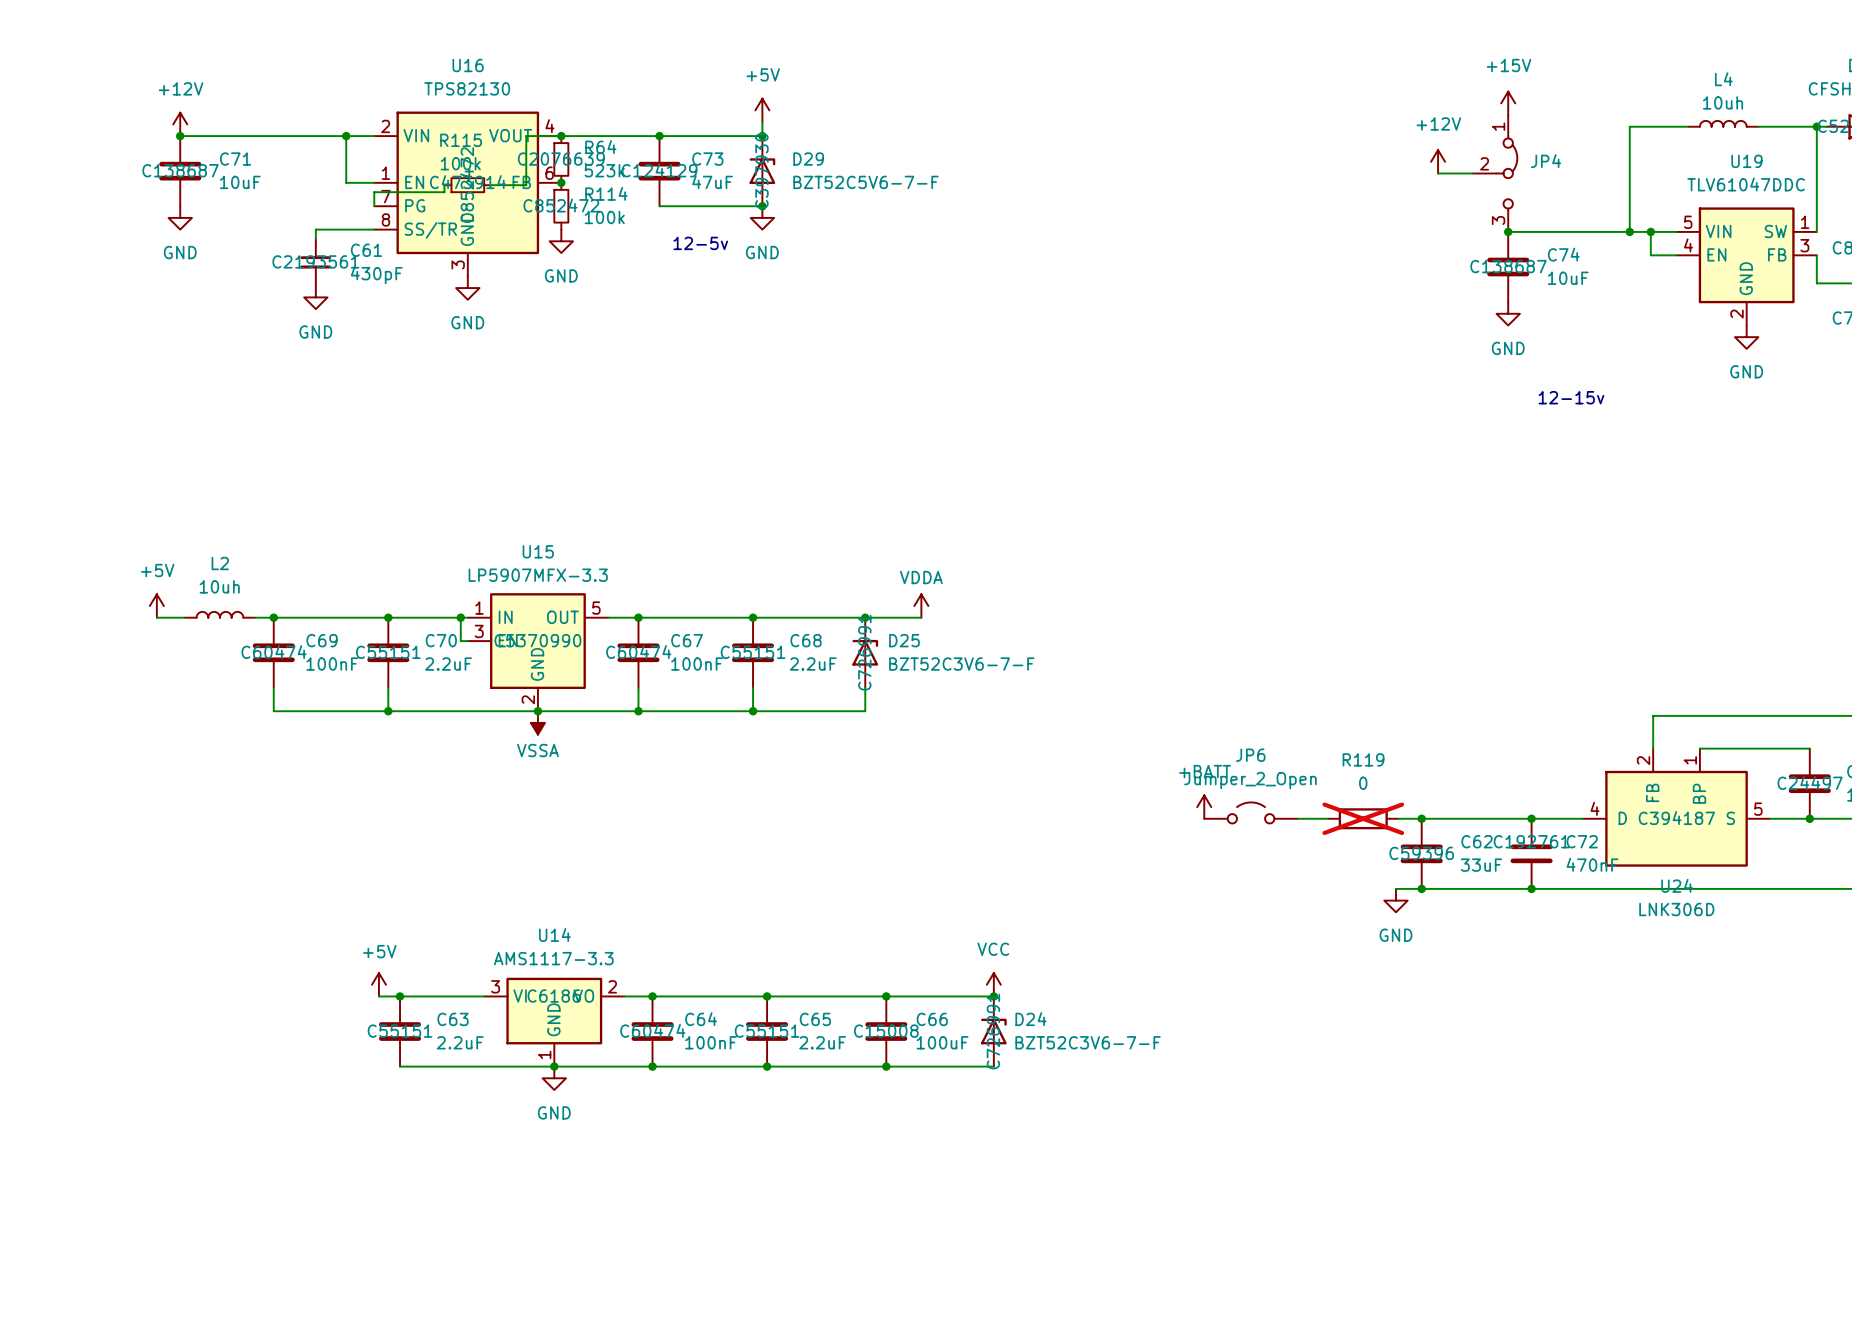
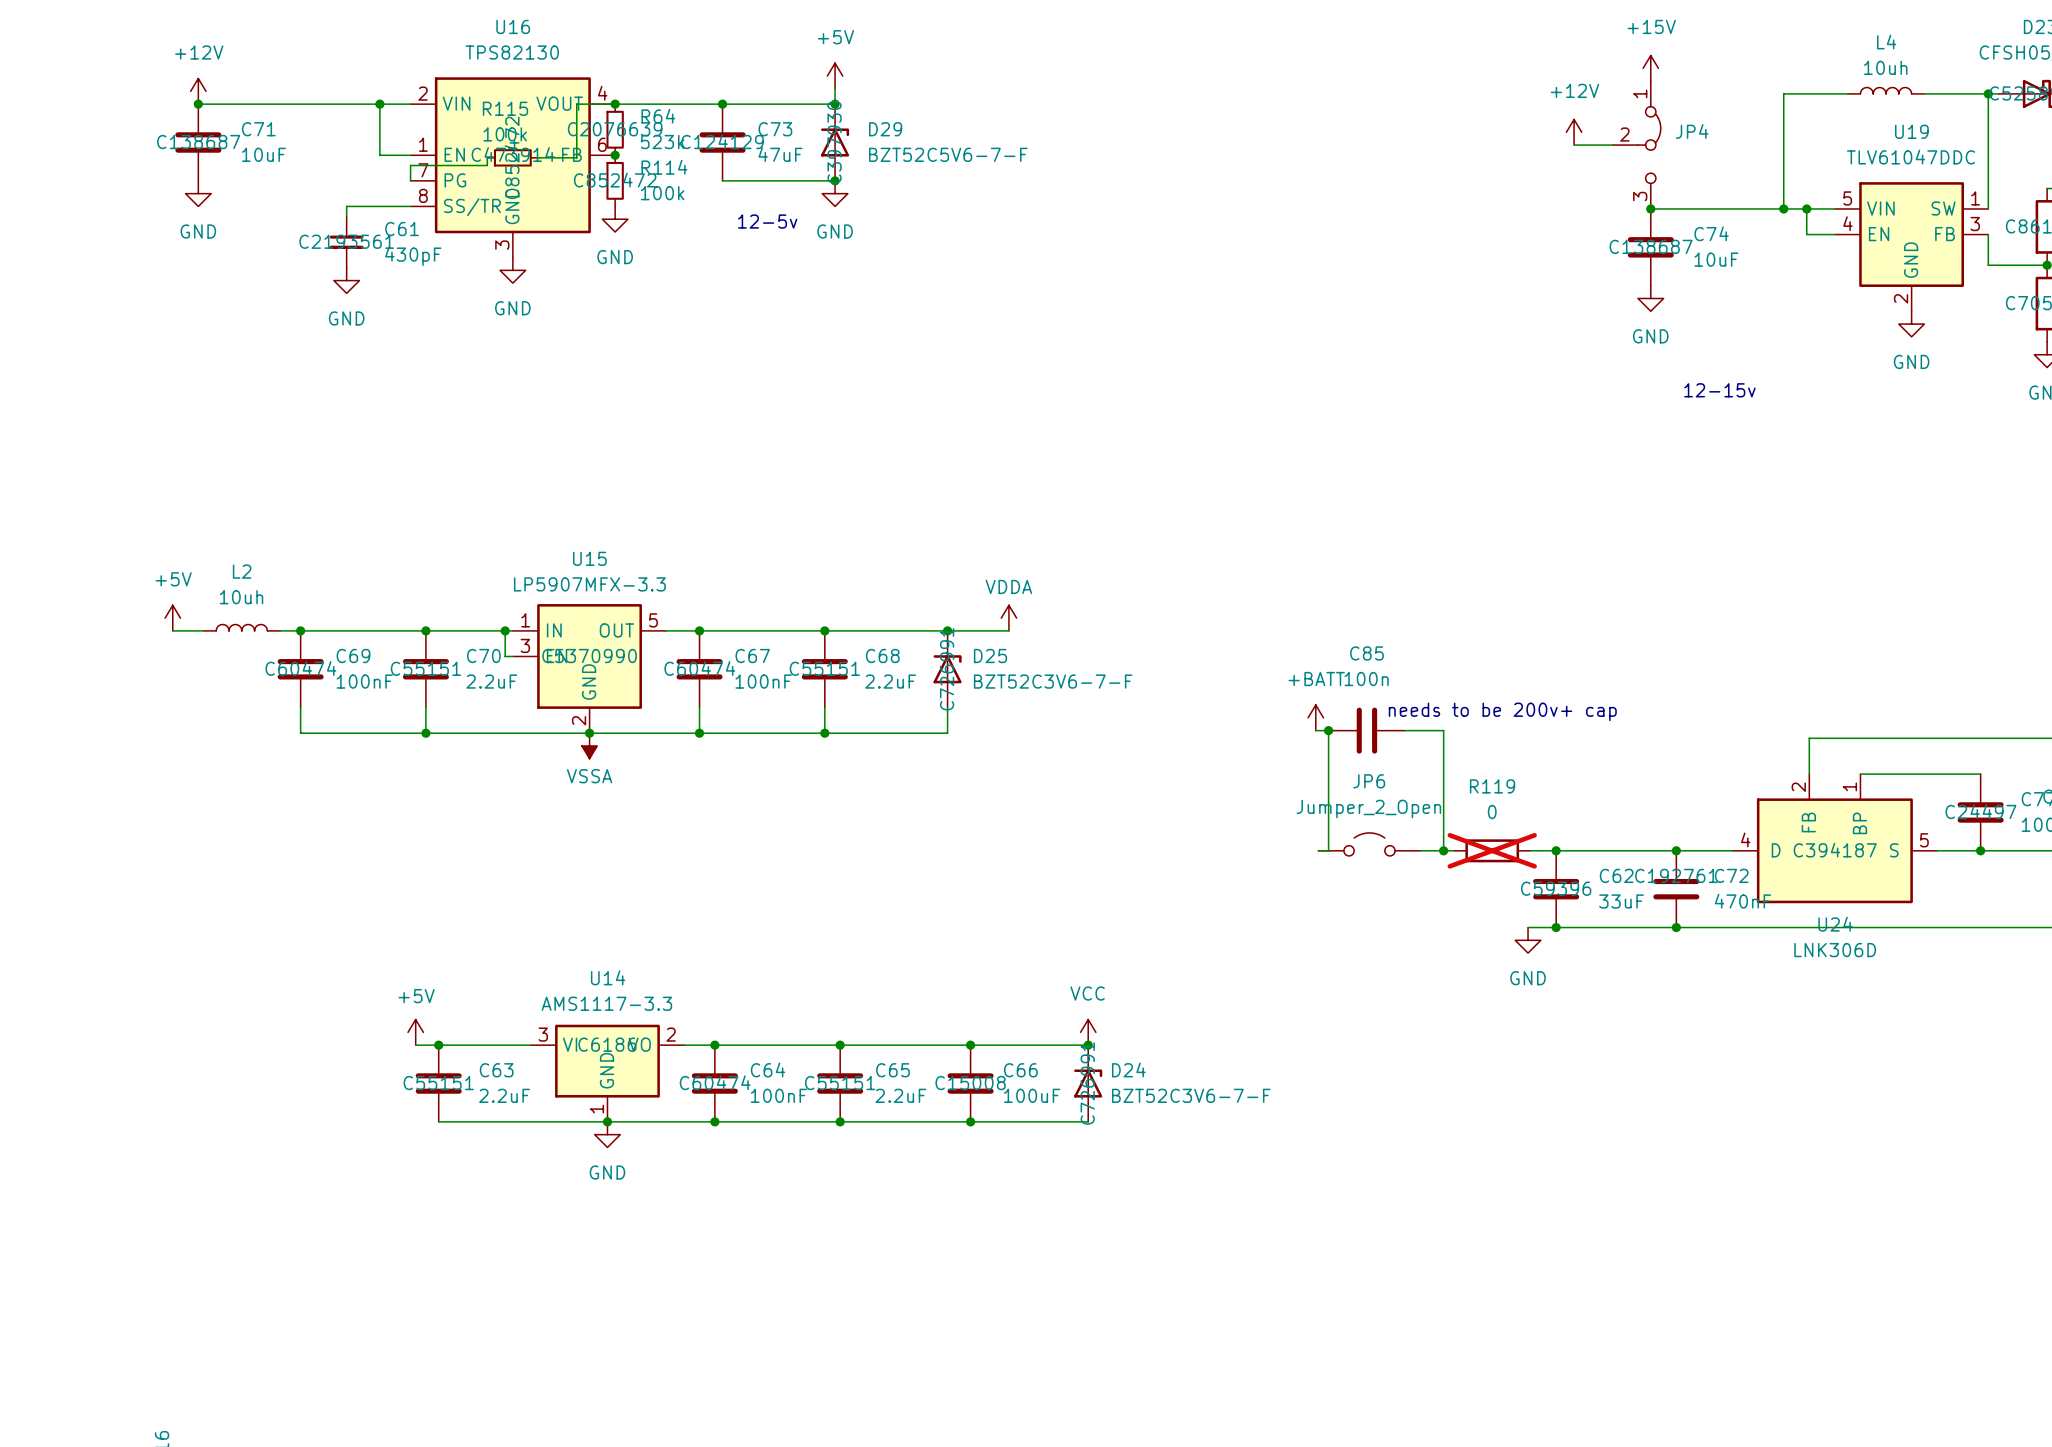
text: none -> needs to be 200v+ cap (1502, 711)
wire: none -> (1315, 730) (1328, 730) (1328, 850) (1318, 850)
junction: none -> (1328, 730)
C85: none -> 100n (1366, 730)
wire: none -> (1405, 730) (1443, 730) (1443, 850)
power symbol position: +BATT (1204, 807) -> +BATT (1315, 717)
junction: none -> (1443, 850)

